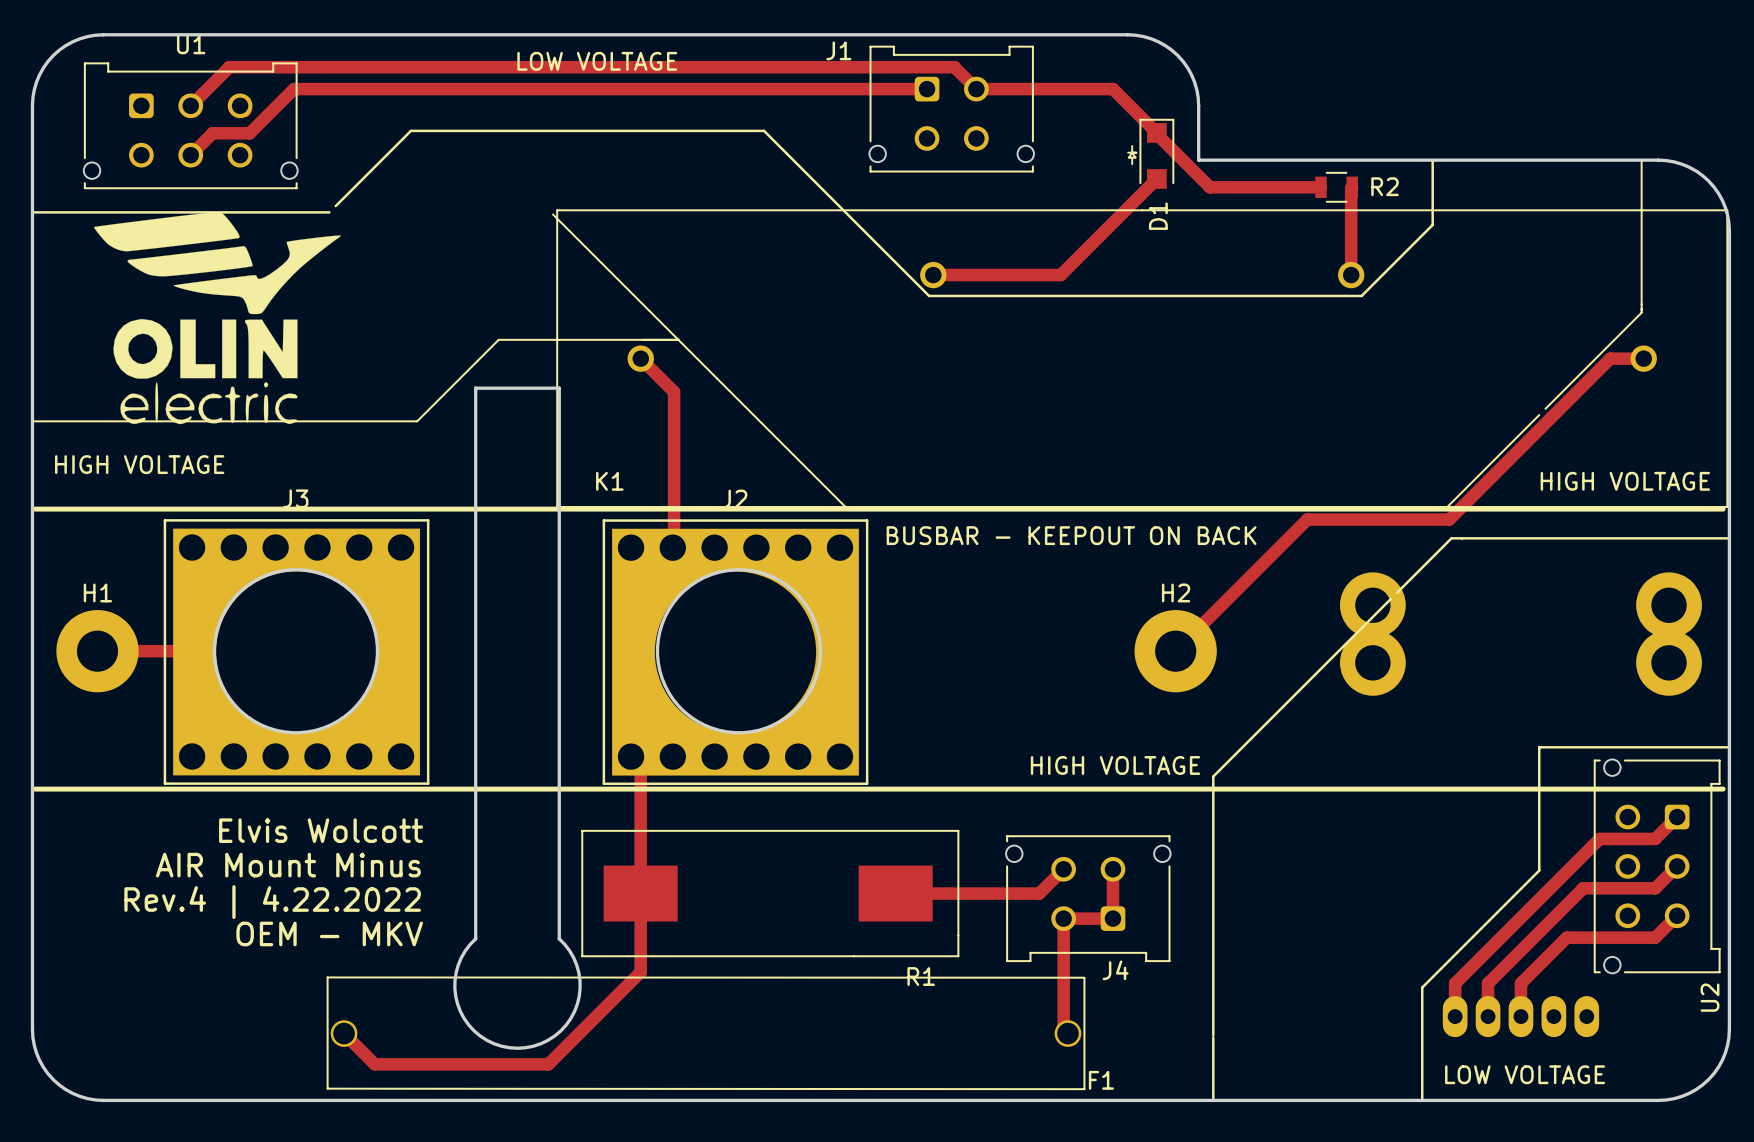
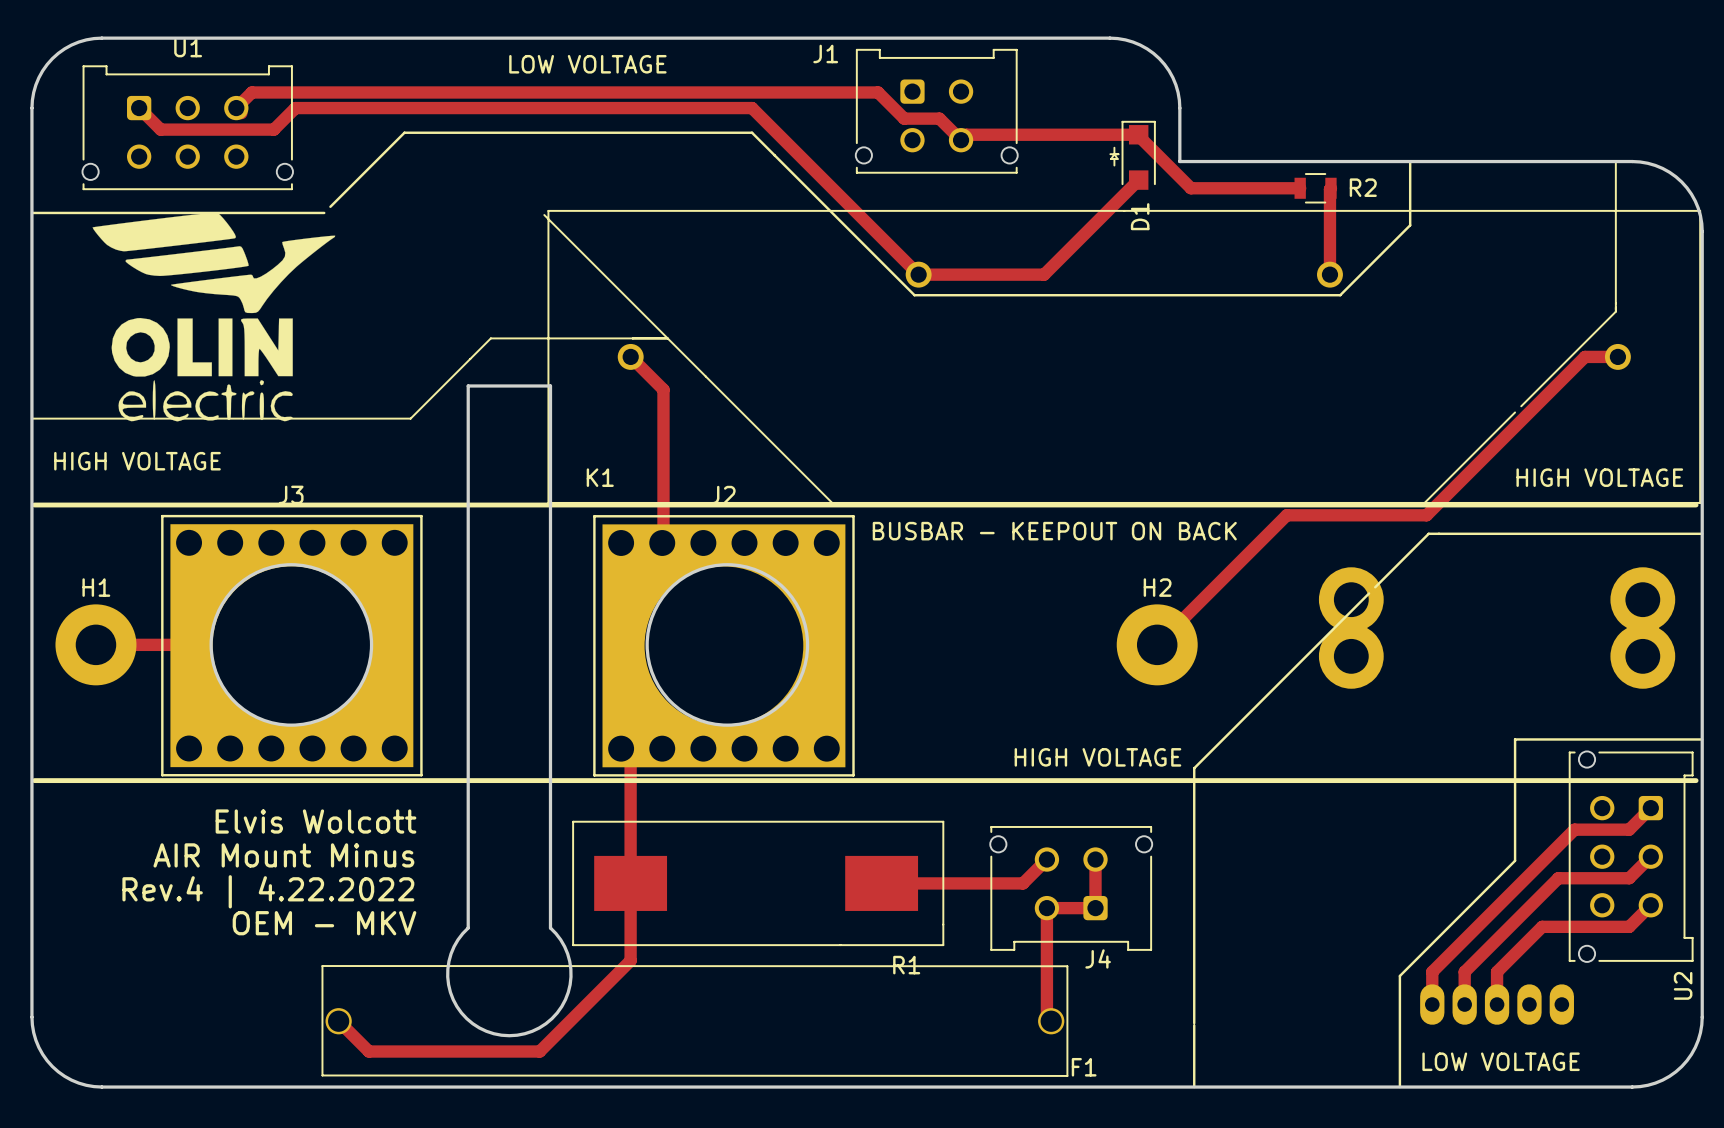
track: (927, 89) (293, 89) (249, 133) (212, 133) (190, 155) -> none
track: none -> (139, 108) (160, 129) (273, 129) (295, 108) (752, 108) (918, 274)
track: (190, 105) (229, 67) (954, 67) (976, 89) (1113, 89) (1156, 132) -> (236, 108) (251, 92) (878, 92) (904, 118) (939, 118) (961, 140) (966, 134) (1138, 134)

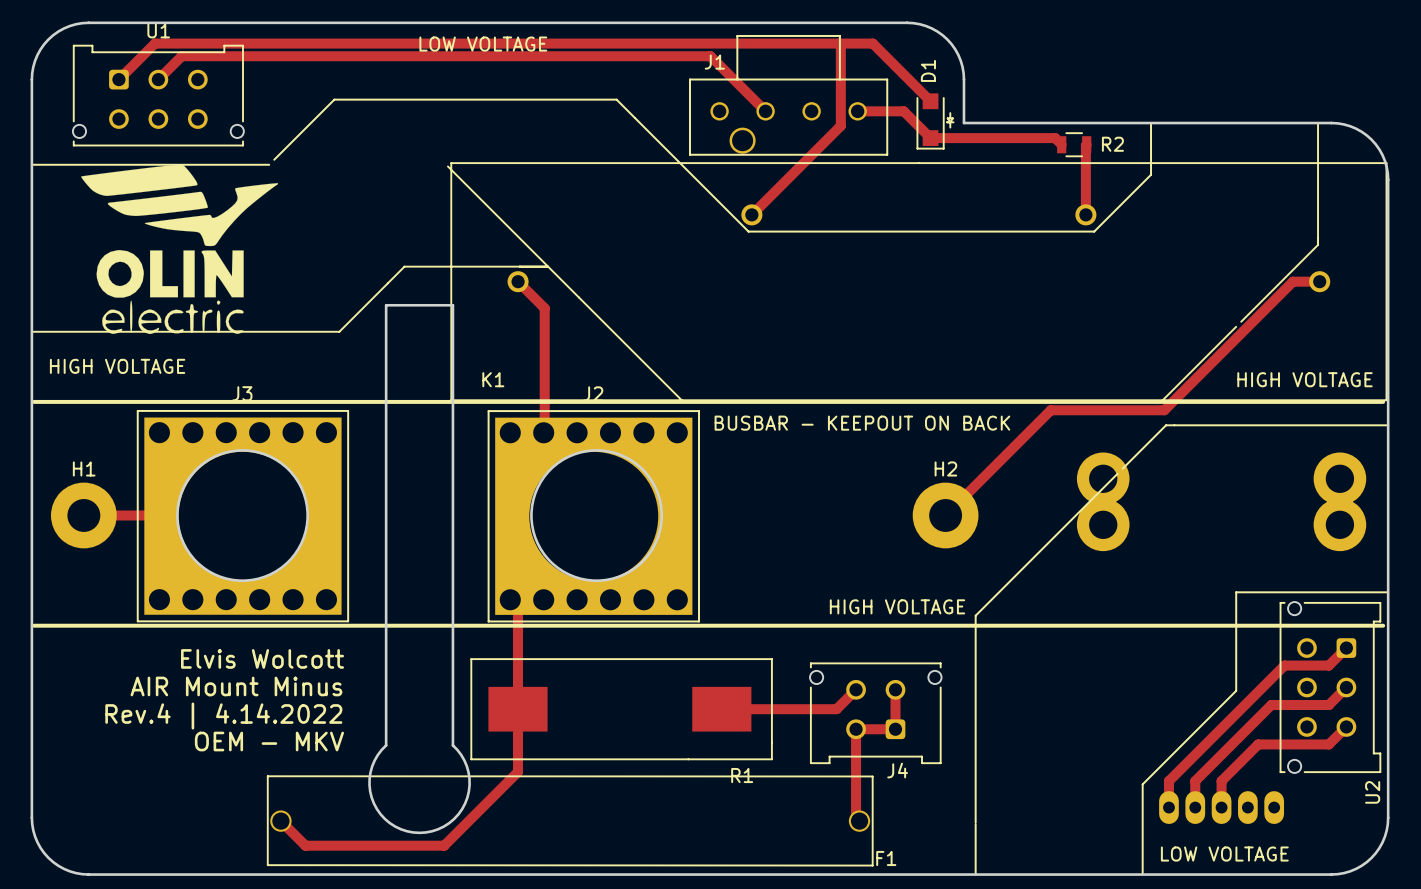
J1 footprint: [855, 48, 1018, 174] -> [689, 35, 889, 156]
track: none -> (839, 43) (840, 125) (751, 214)
track: (139, 108) (160, 129) (273, 129) (295, 108) (752, 108) (918, 274) (1044, 274) (1138, 180) -> (118, 79) (154, 43) (872, 43) (930, 101)
track: none -> (158, 79) (181, 56) (710, 56) (765, 111)
track: (241, 113) (236, 108) (251, 92) (878, 92) (904, 118) (939, 118) (961, 140) (966, 134) (1138, 134) (1190, 188) (1300, 188) -> (857, 111) (903, 111) (930, 138) (1055, 138) (1061, 144)
D1 rotation: 0° (1132, 155) -> 180° (935, 121)
text: Rev.4 | 4.22.2022 (268, 891) -> Rev.4 | 4.14.2022 (223, 716)

